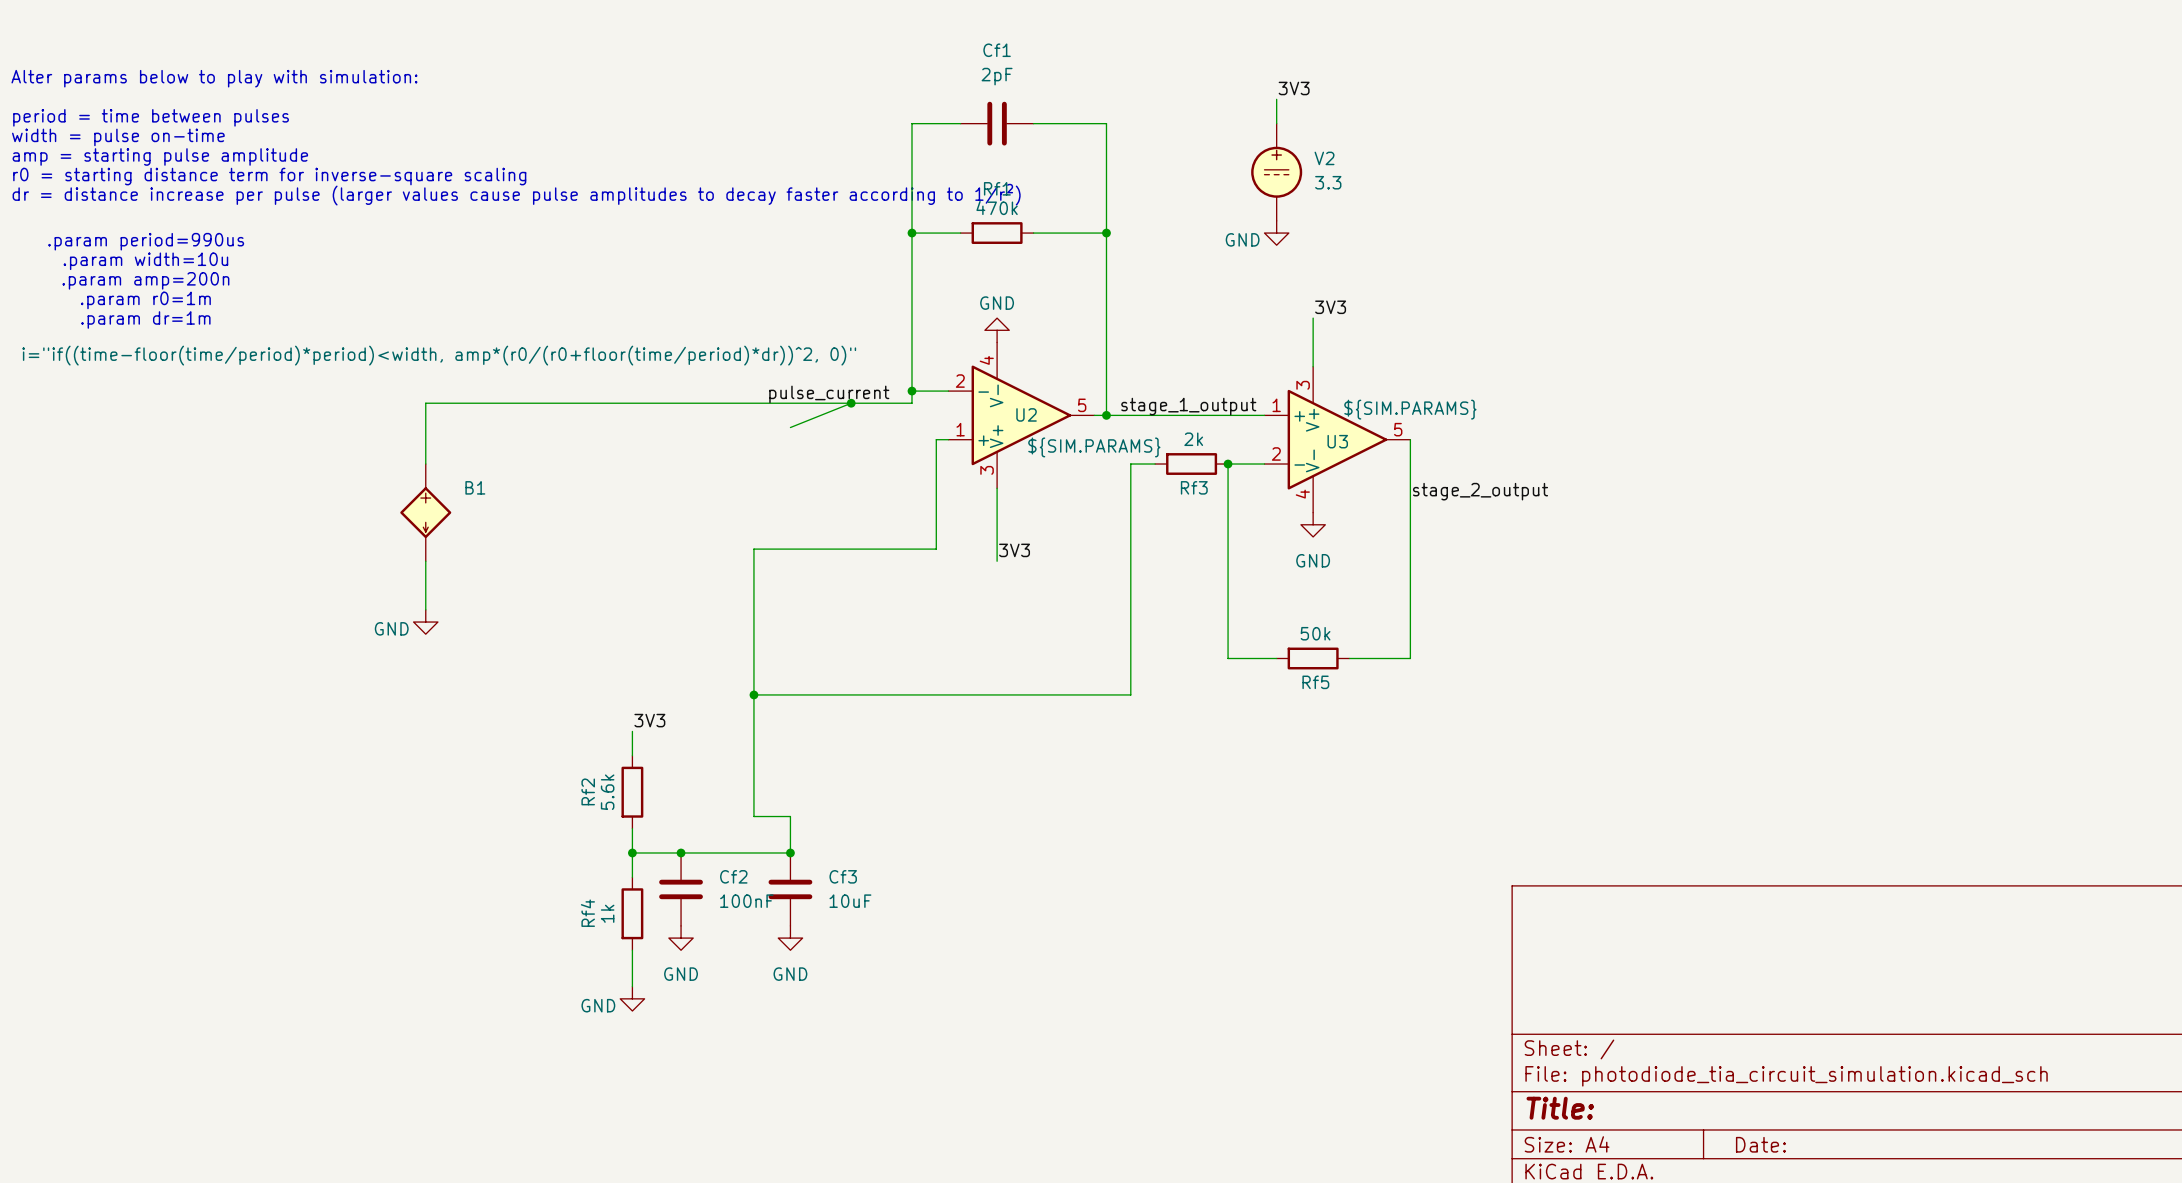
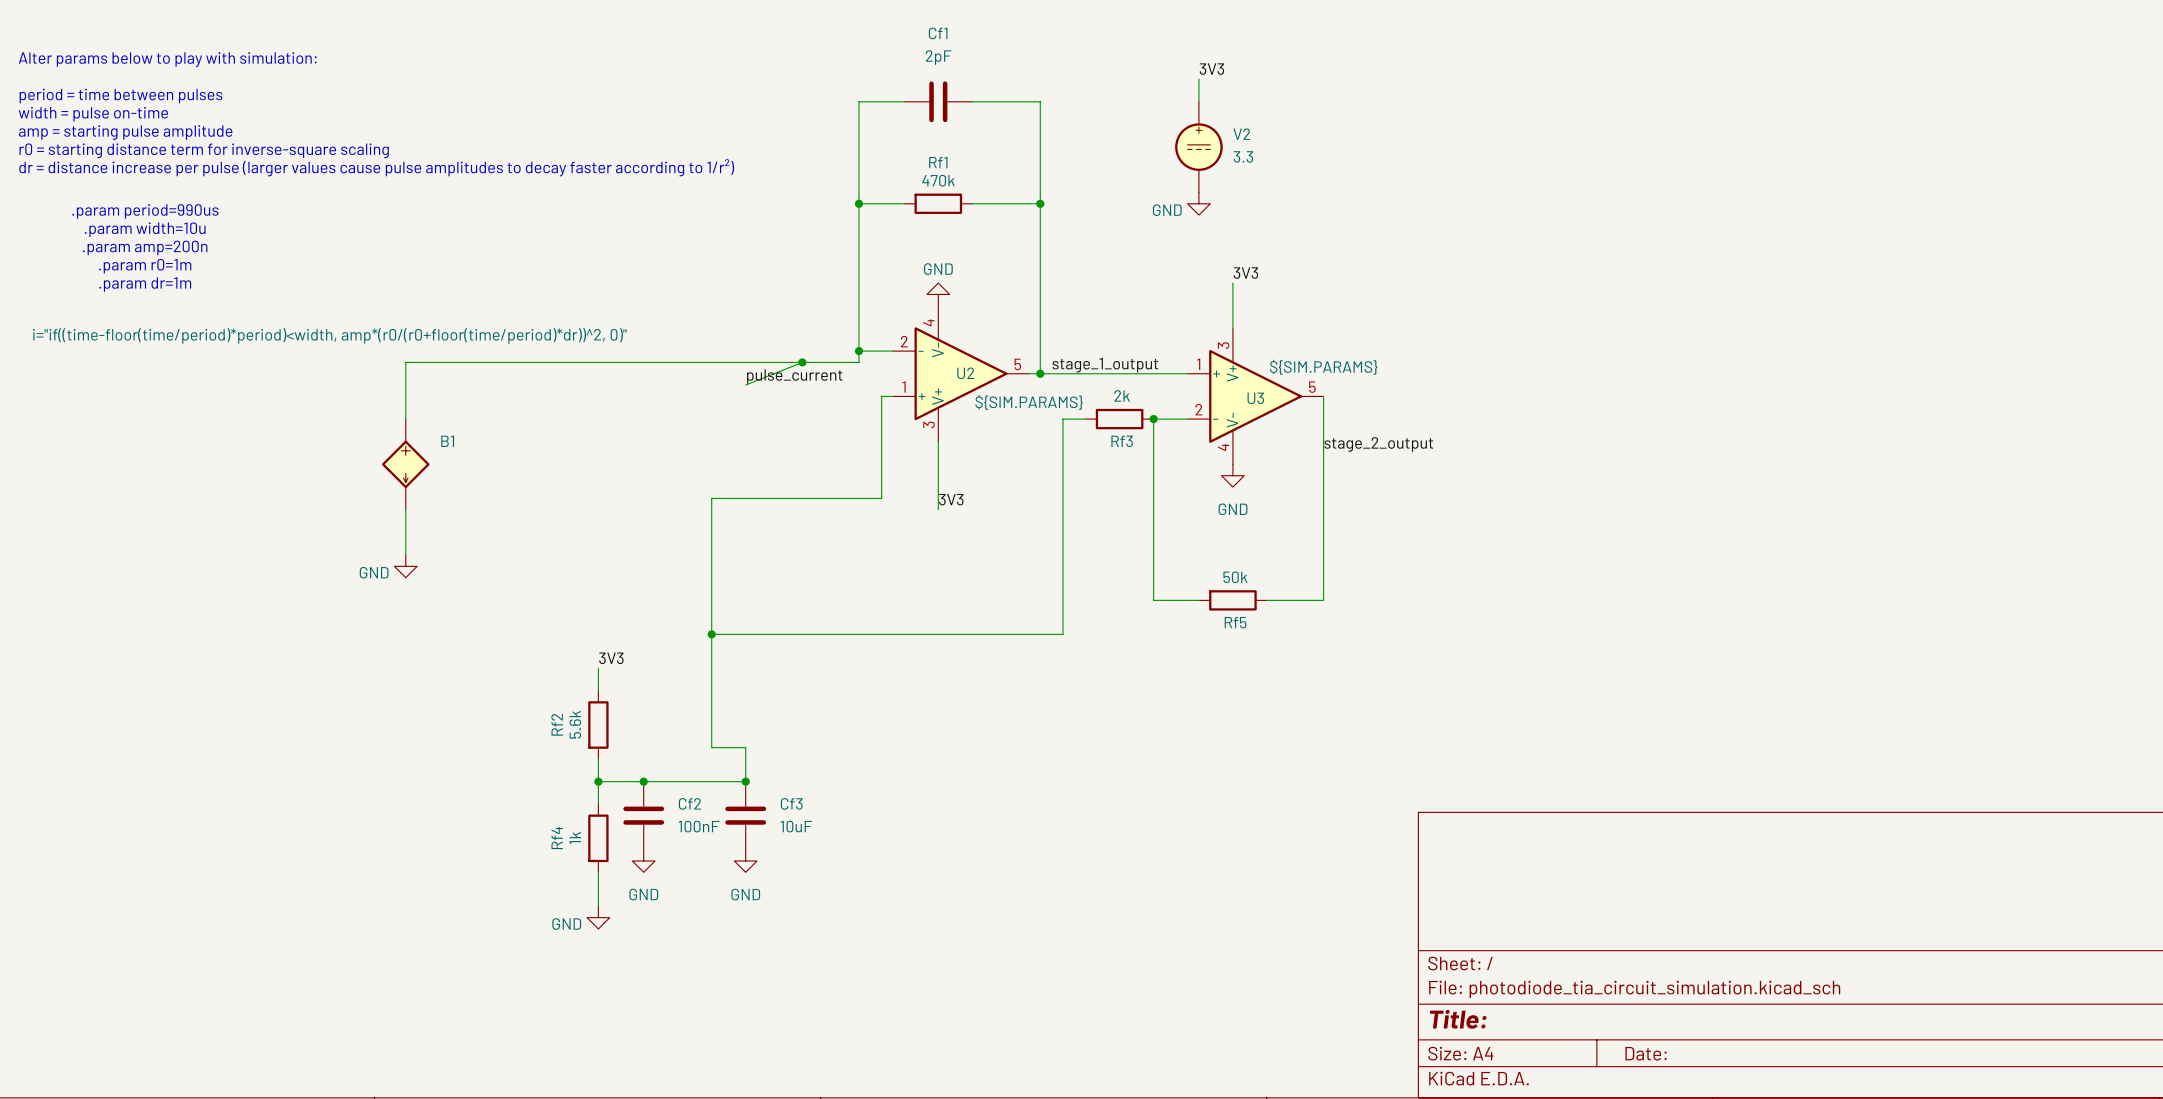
B1 value position: i="if((time-floor(time/period)*period)<width, amp*(r0/(r0+floor(time/period)*dr))^2, 0)" (439, 355) -> i="if((time-floor(time/period)*period)<width, amp*(r0/(r0+floor(time/period)*dr))^2, 0)" (329, 335)
label position: pulse_current (829, 394) -> pulse_current (794, 376)

